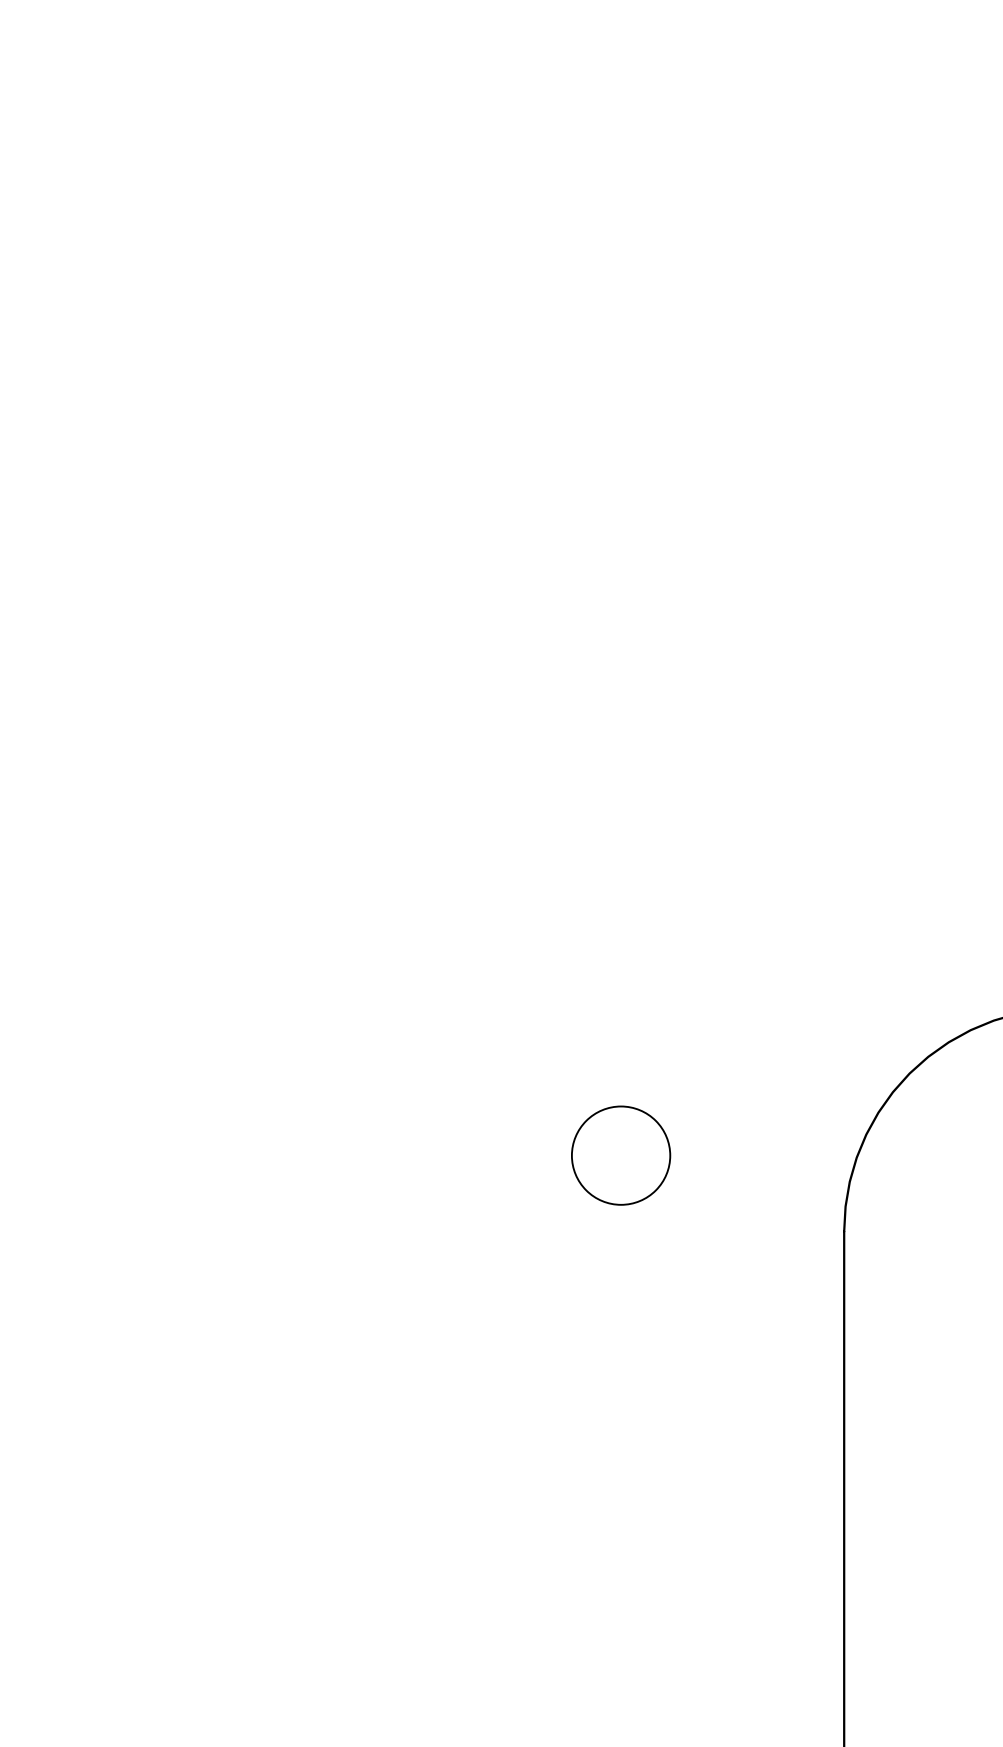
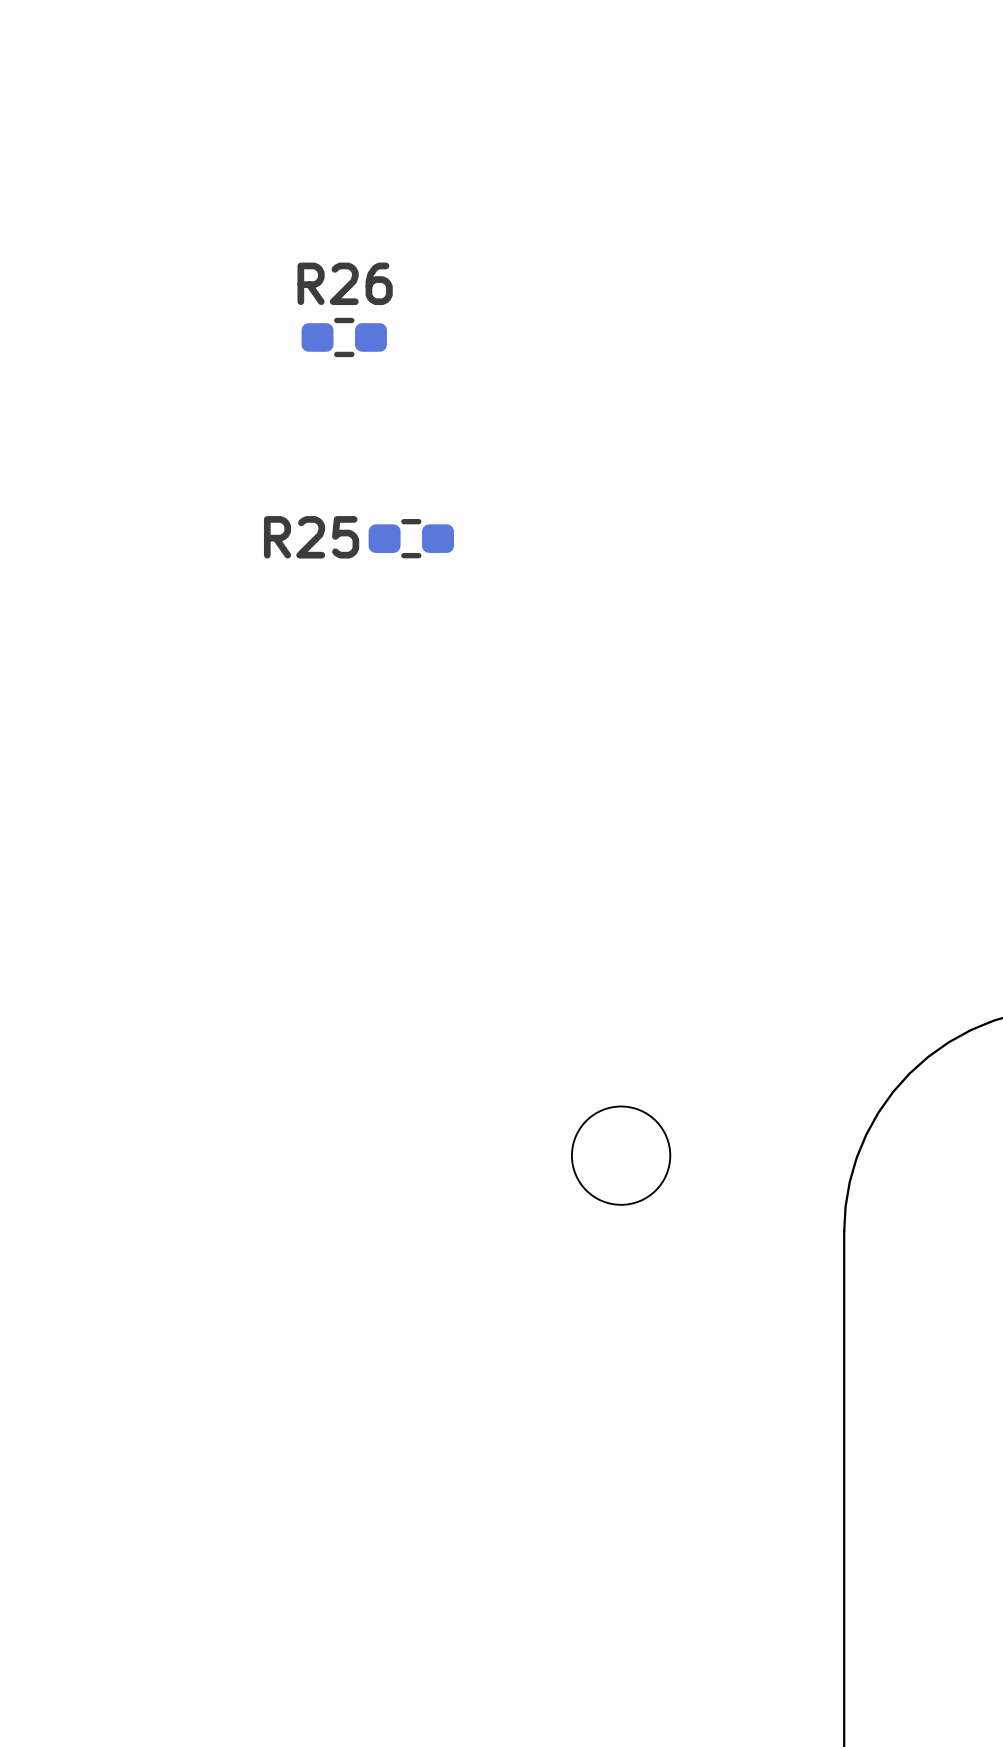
R26: none -> (344, 337)
R25: none -> (411, 538)

